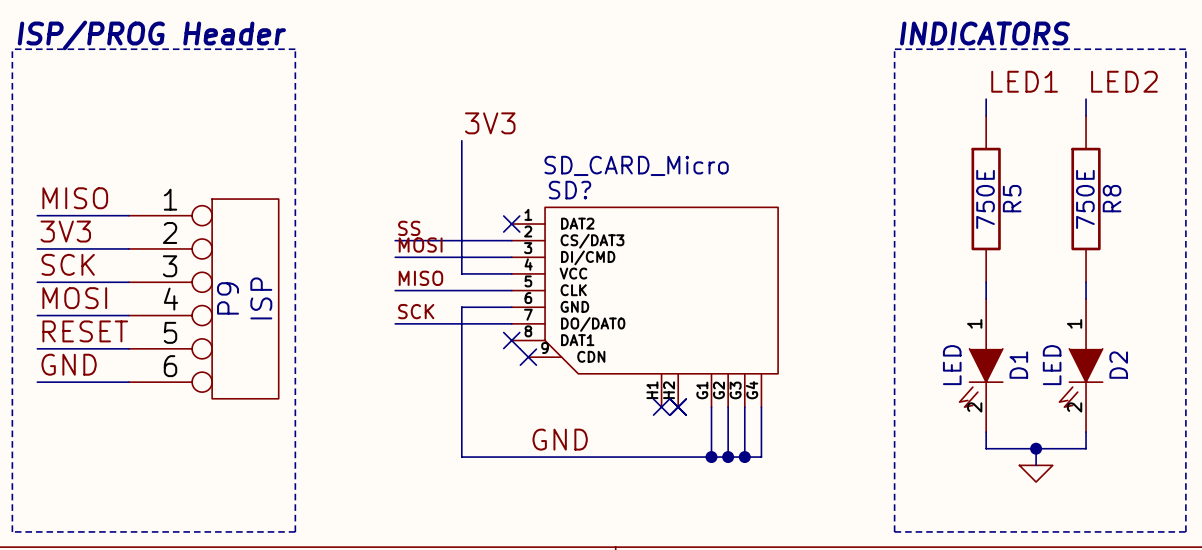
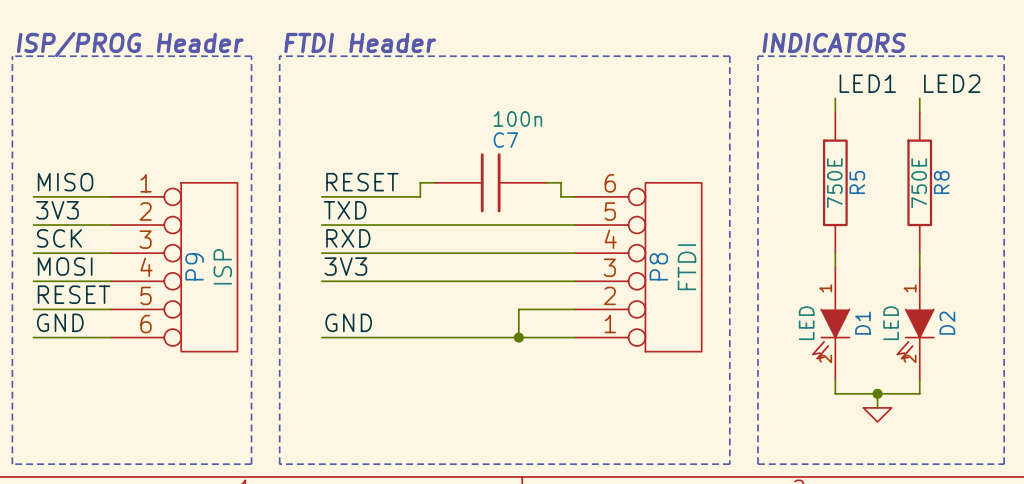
text: none -> FTDI Header (360, 42)
line: none -> (279, 56) (729, 56) (729, 464) (279, 464) (279, 56)
label position: 3V3 (490, 123) -> 3V3 (345, 266)
wire: (461, 140) (461, 273) (511, 273) -> none
label: none -> RESET (362, 182)
wire: none -> (434, 182) (420, 182) (420, 196) (321, 196)
C7: none -> 100n (490, 182)
wire: none -> (546, 182) (561, 182) (561, 196) (575, 196)
no-connect mark: (511, 224) -> none
label: SS (409, 228) -> none
label: none -> TXD (345, 210)
wire: (395, 240) (511, 240) -> none
label: MOSI (420, 245) -> none
wire: none -> (321, 225) (575, 225)
wire: (395, 257) (511, 257) -> none
label: none -> RXD (348, 238)
label: MISO (420, 278) -> none
wire: none -> (321, 253) (575, 253)
wire: (395, 290) (511, 290) -> none
P8: none -> FTDI (638, 267)
wire: (511, 307) (461, 307) (461, 457) (761, 457) (761, 407) -> none
SD?: SD_CARD_Micro (644, 307) -> none
label: SCK (416, 311) -> none
wire: none -> (321, 281) (575, 281)
wire: (395, 323) (511, 323) -> none
no-connect mark: (511, 340) -> none
wire: none -> (575, 309) (518, 309) (518, 337)
no-connect mark: (528, 357) -> none
wire: none -> (321, 337) (575, 337)
junction: none -> (518, 337)
no-connect mark: (661, 407) -> none
no-connect mark: (678, 407) -> none
wire: (711, 407) (711, 457) -> none
wire: (728, 407) (728, 457) -> none
wire: (744, 407) (744, 457) -> none
label position: GND (560, 439) -> GND (348, 322)
junction: (711, 457) -> none
junction: (728, 457) -> none
junction: (744, 457) -> none

